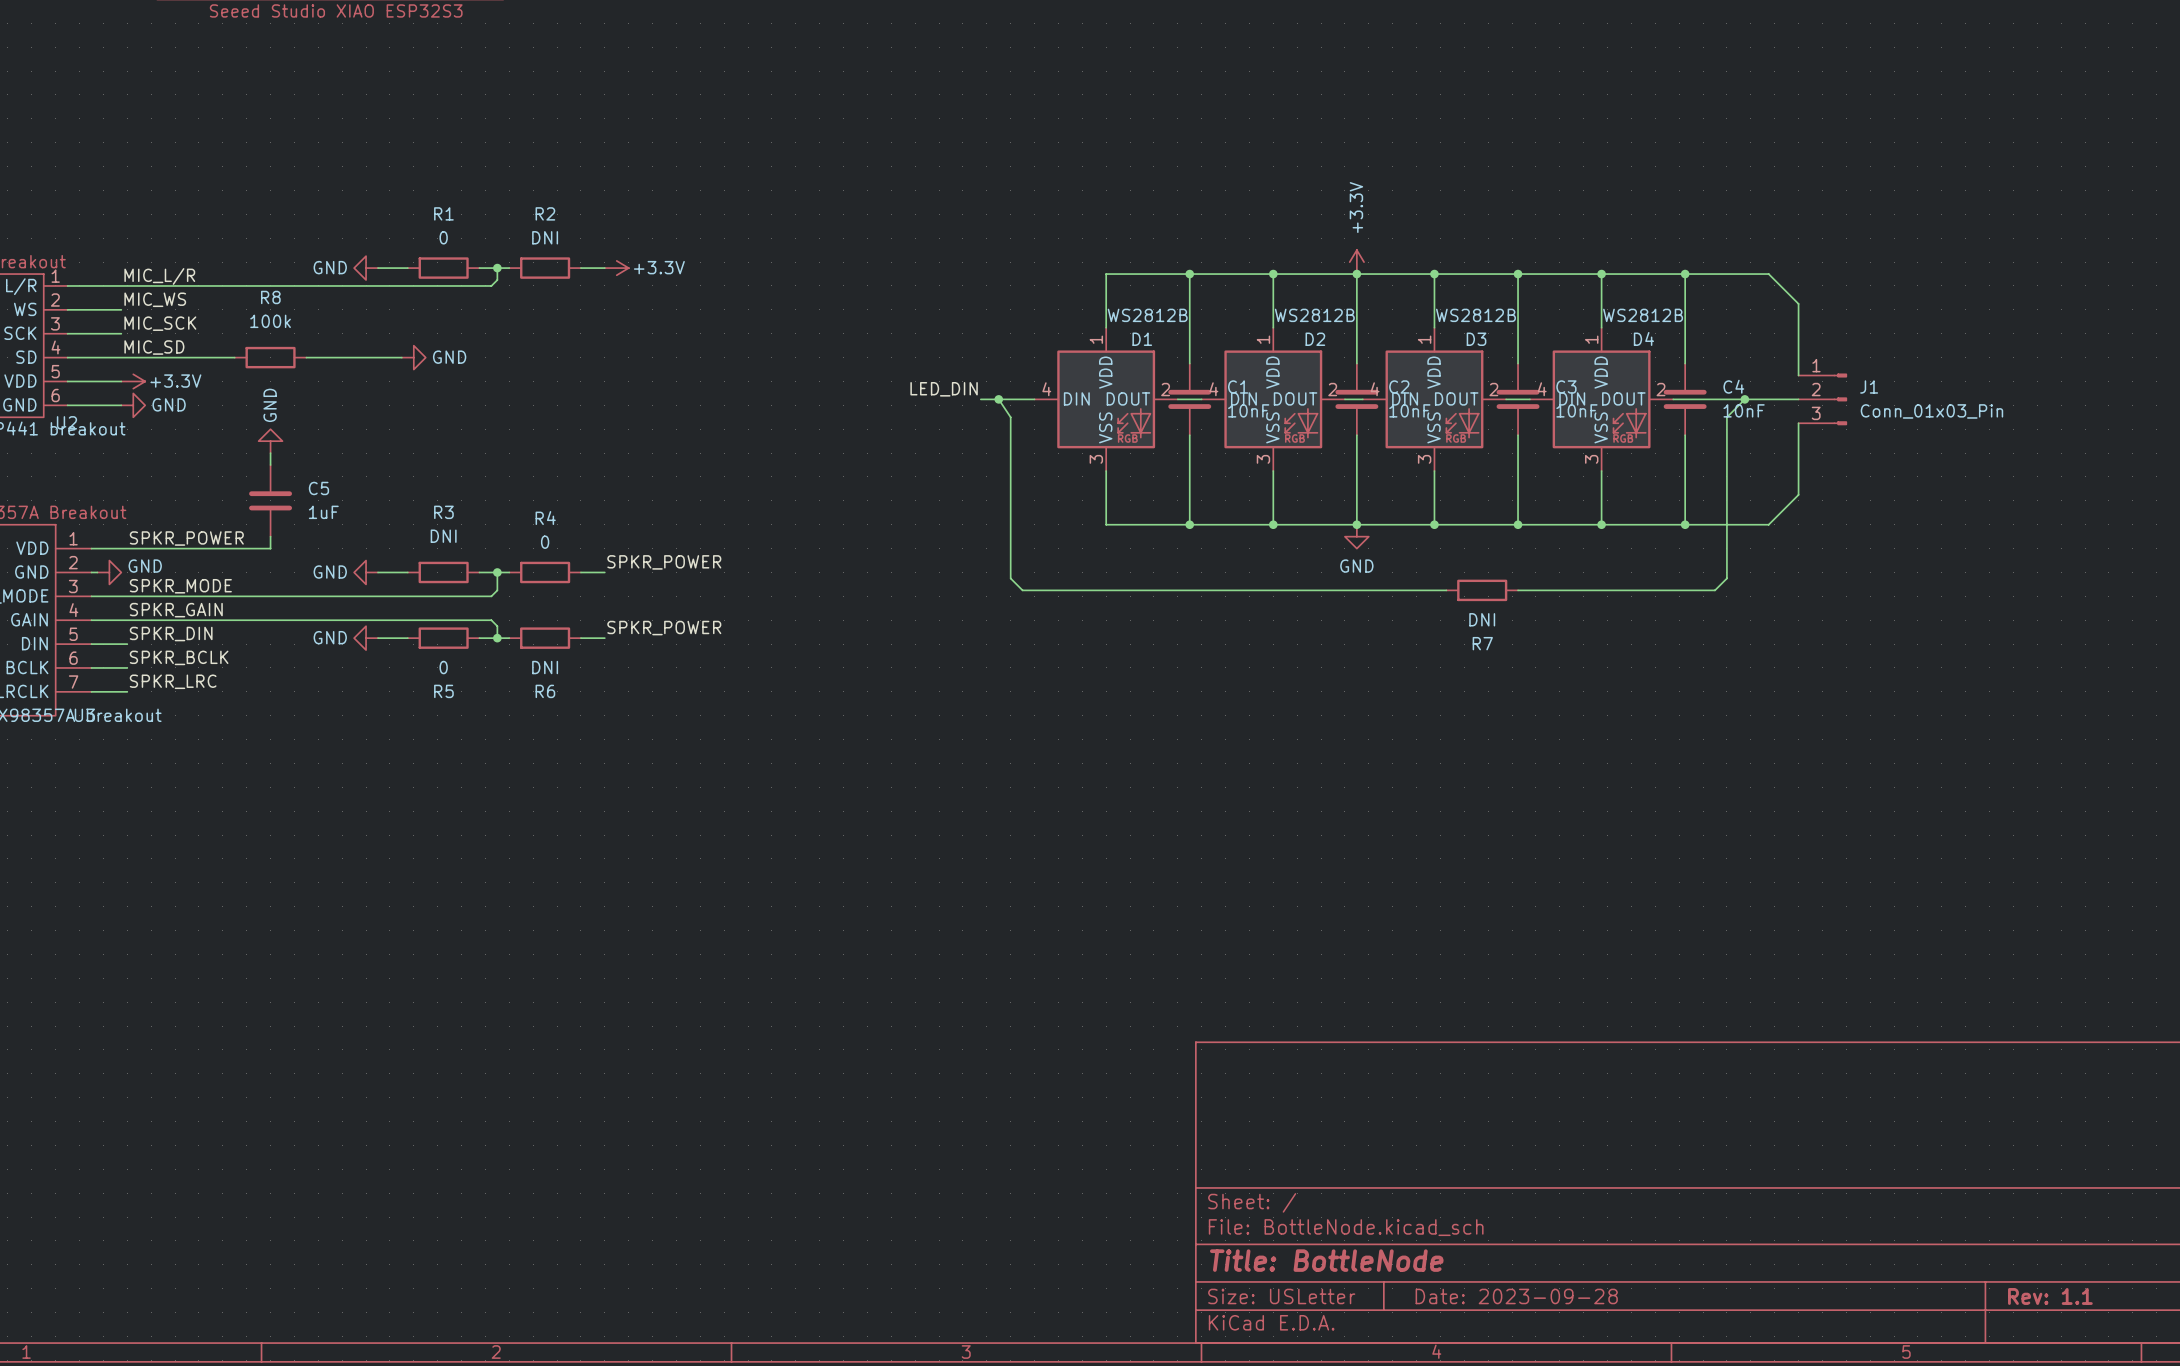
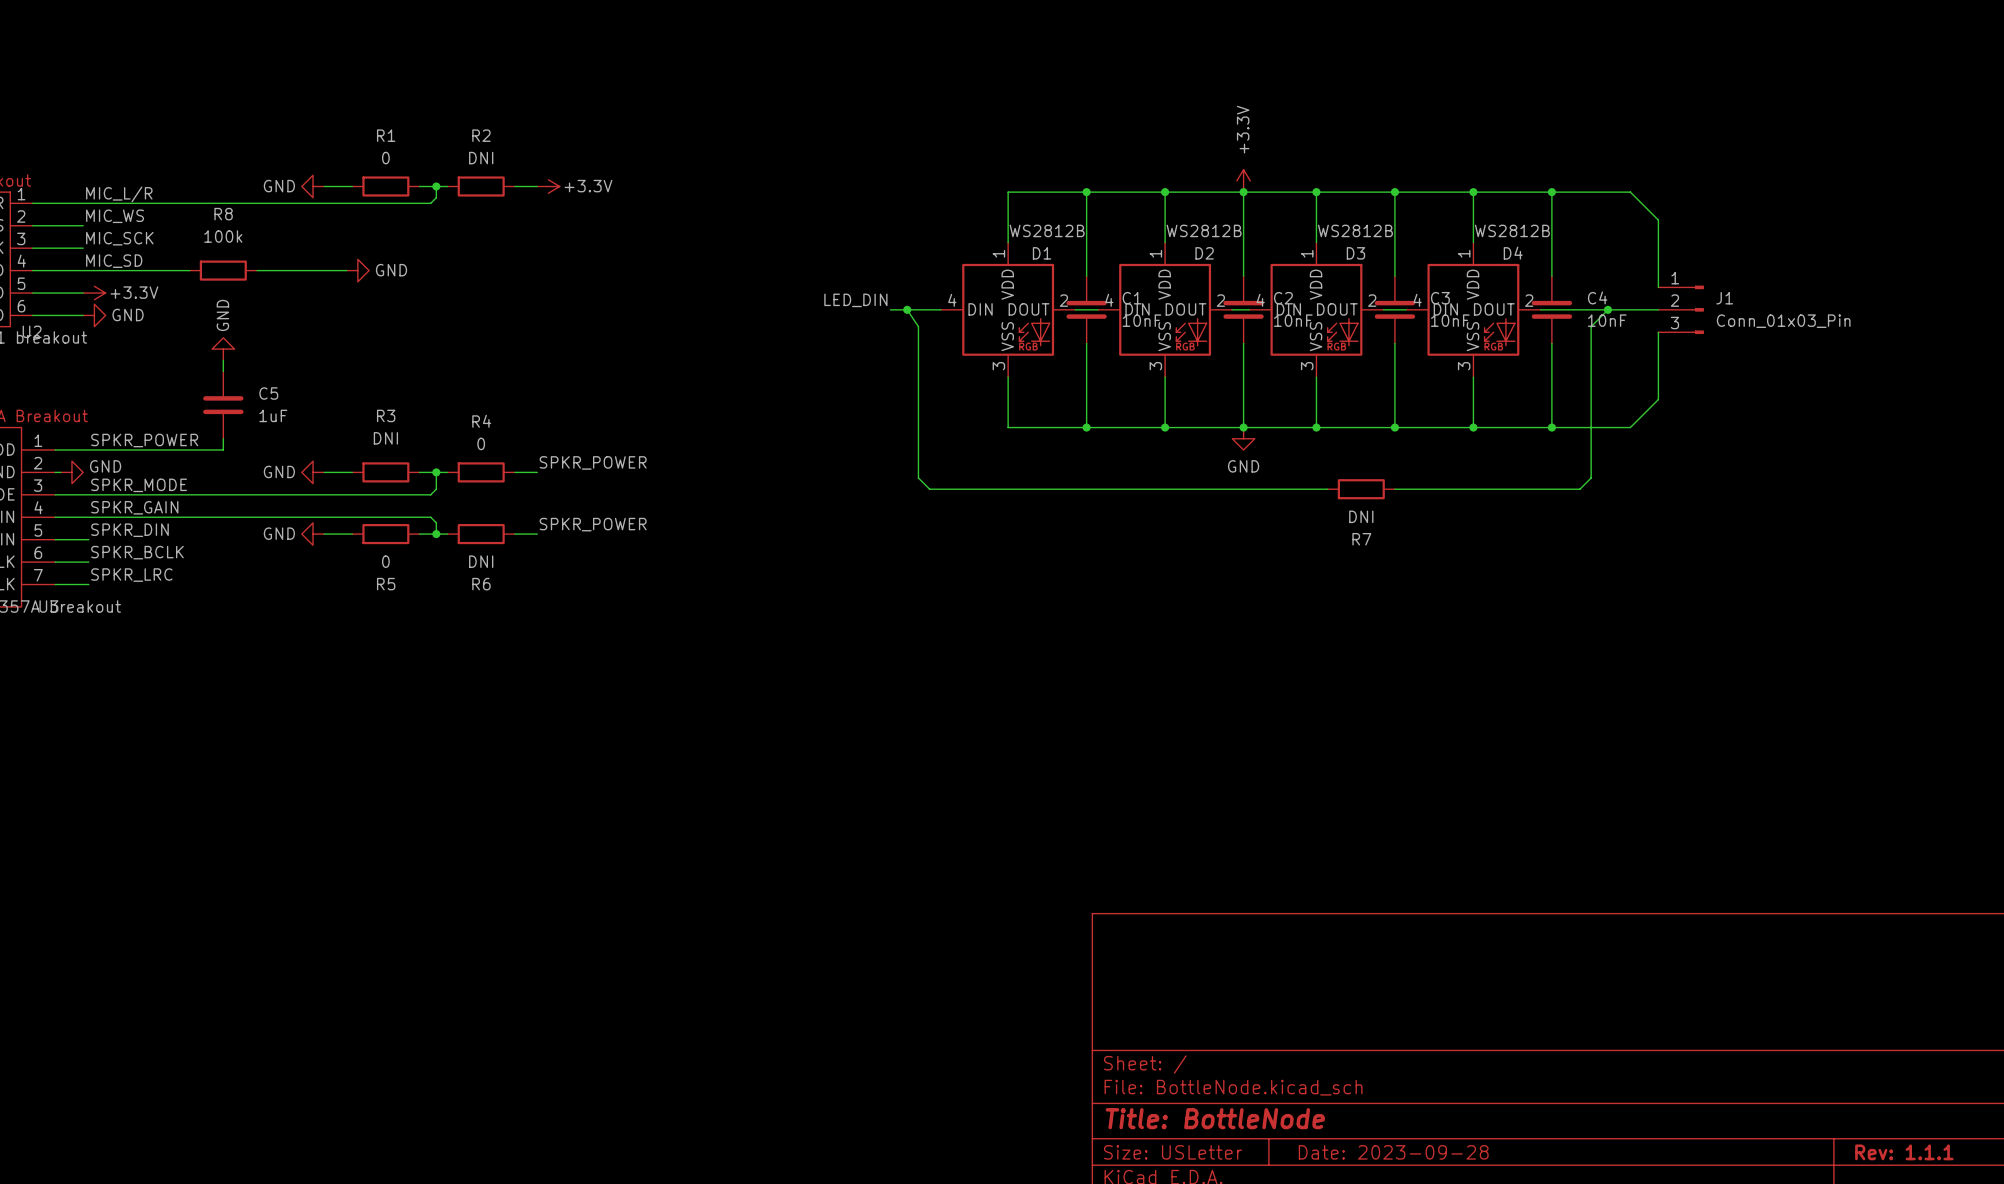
title block: Rev: 1.1 (2050, 1296) -> Rev: 1.1.1 (1904, 1152)

